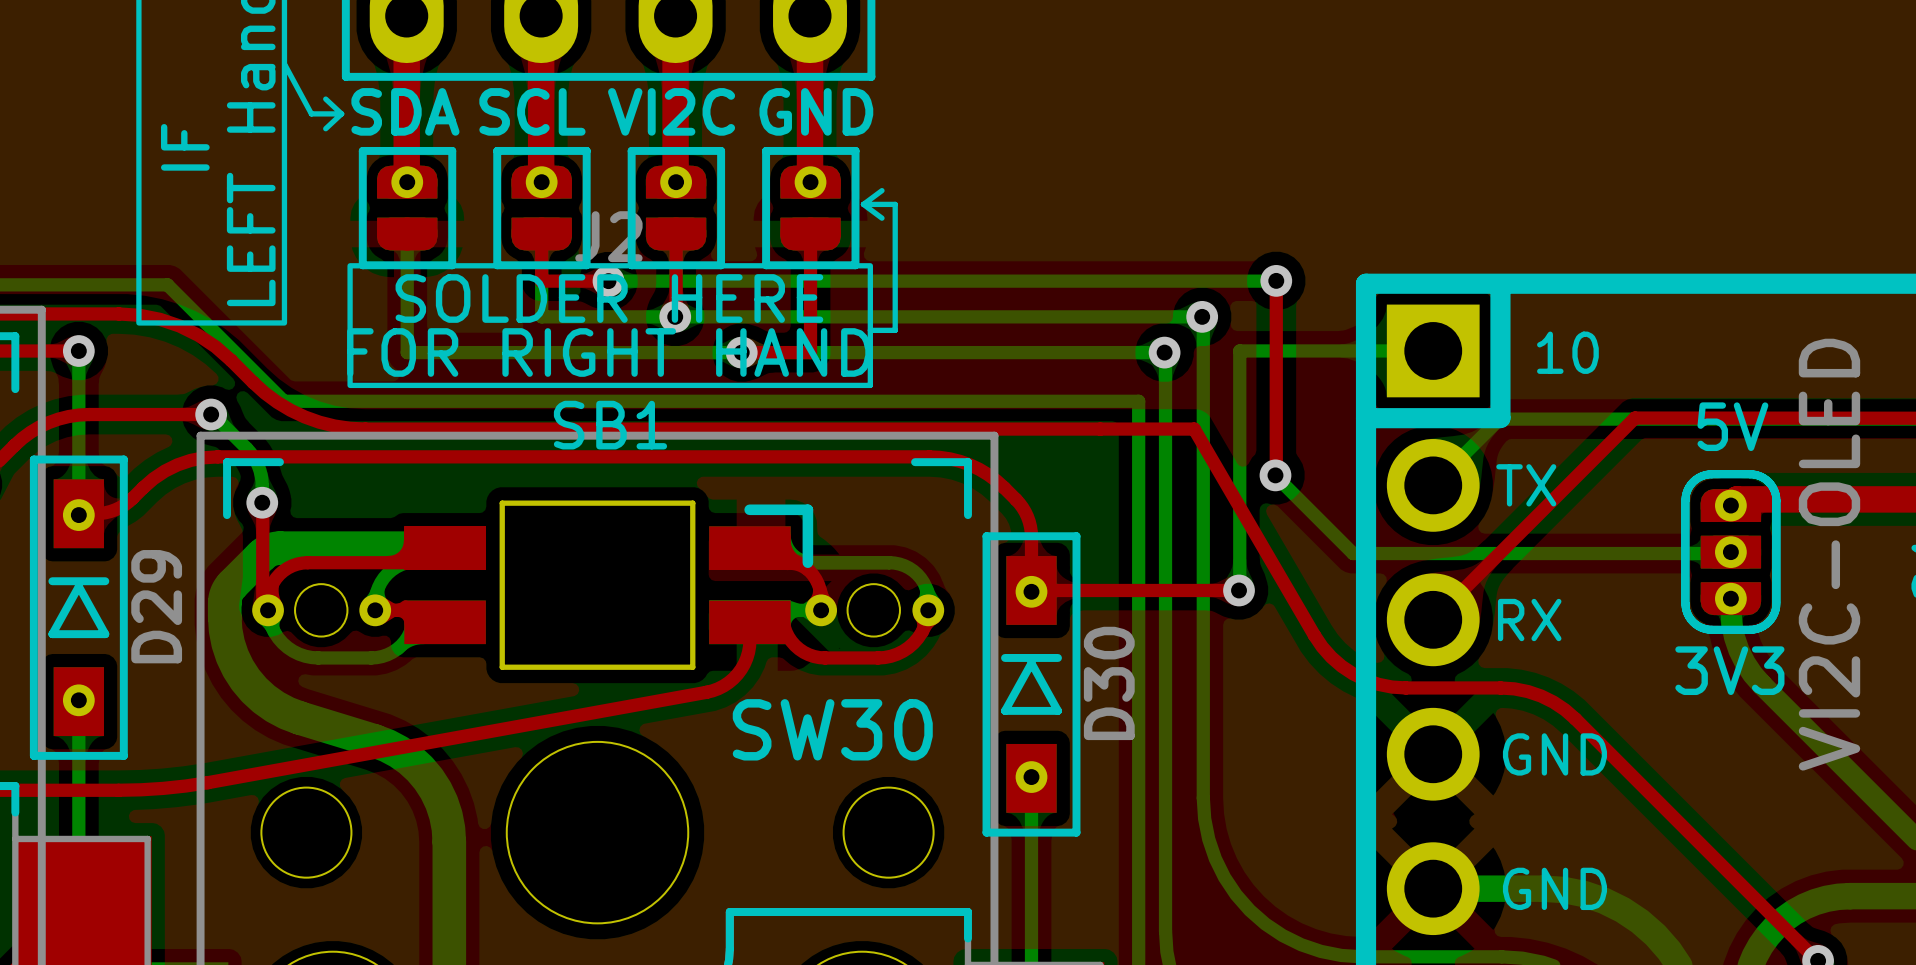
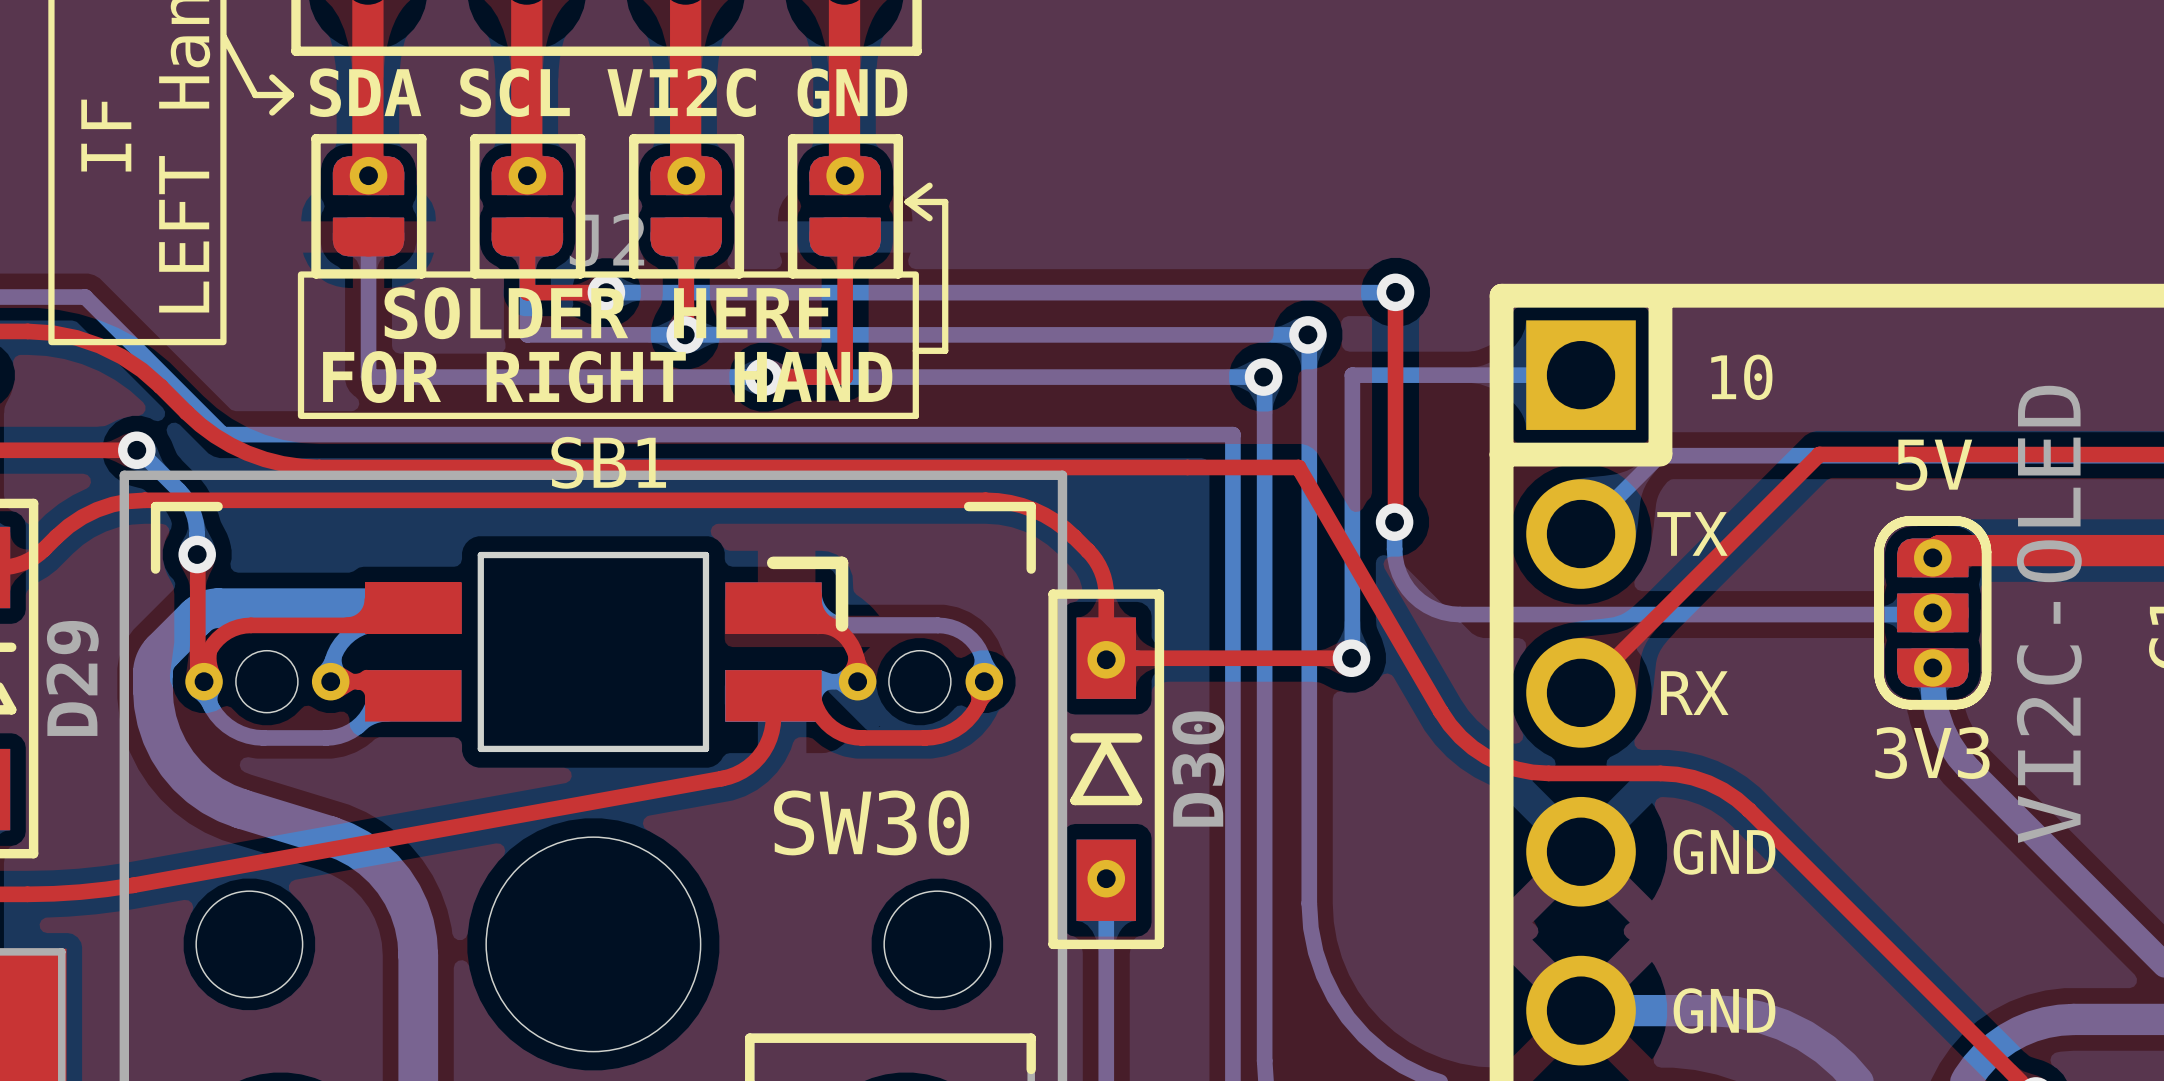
bottom track: (1275, 475) (1353, 553) -> (1394, 522) (1396, 566) (1403, 581) (1413, 595) (1427, 605) (1443, 612) (1486, 614)

